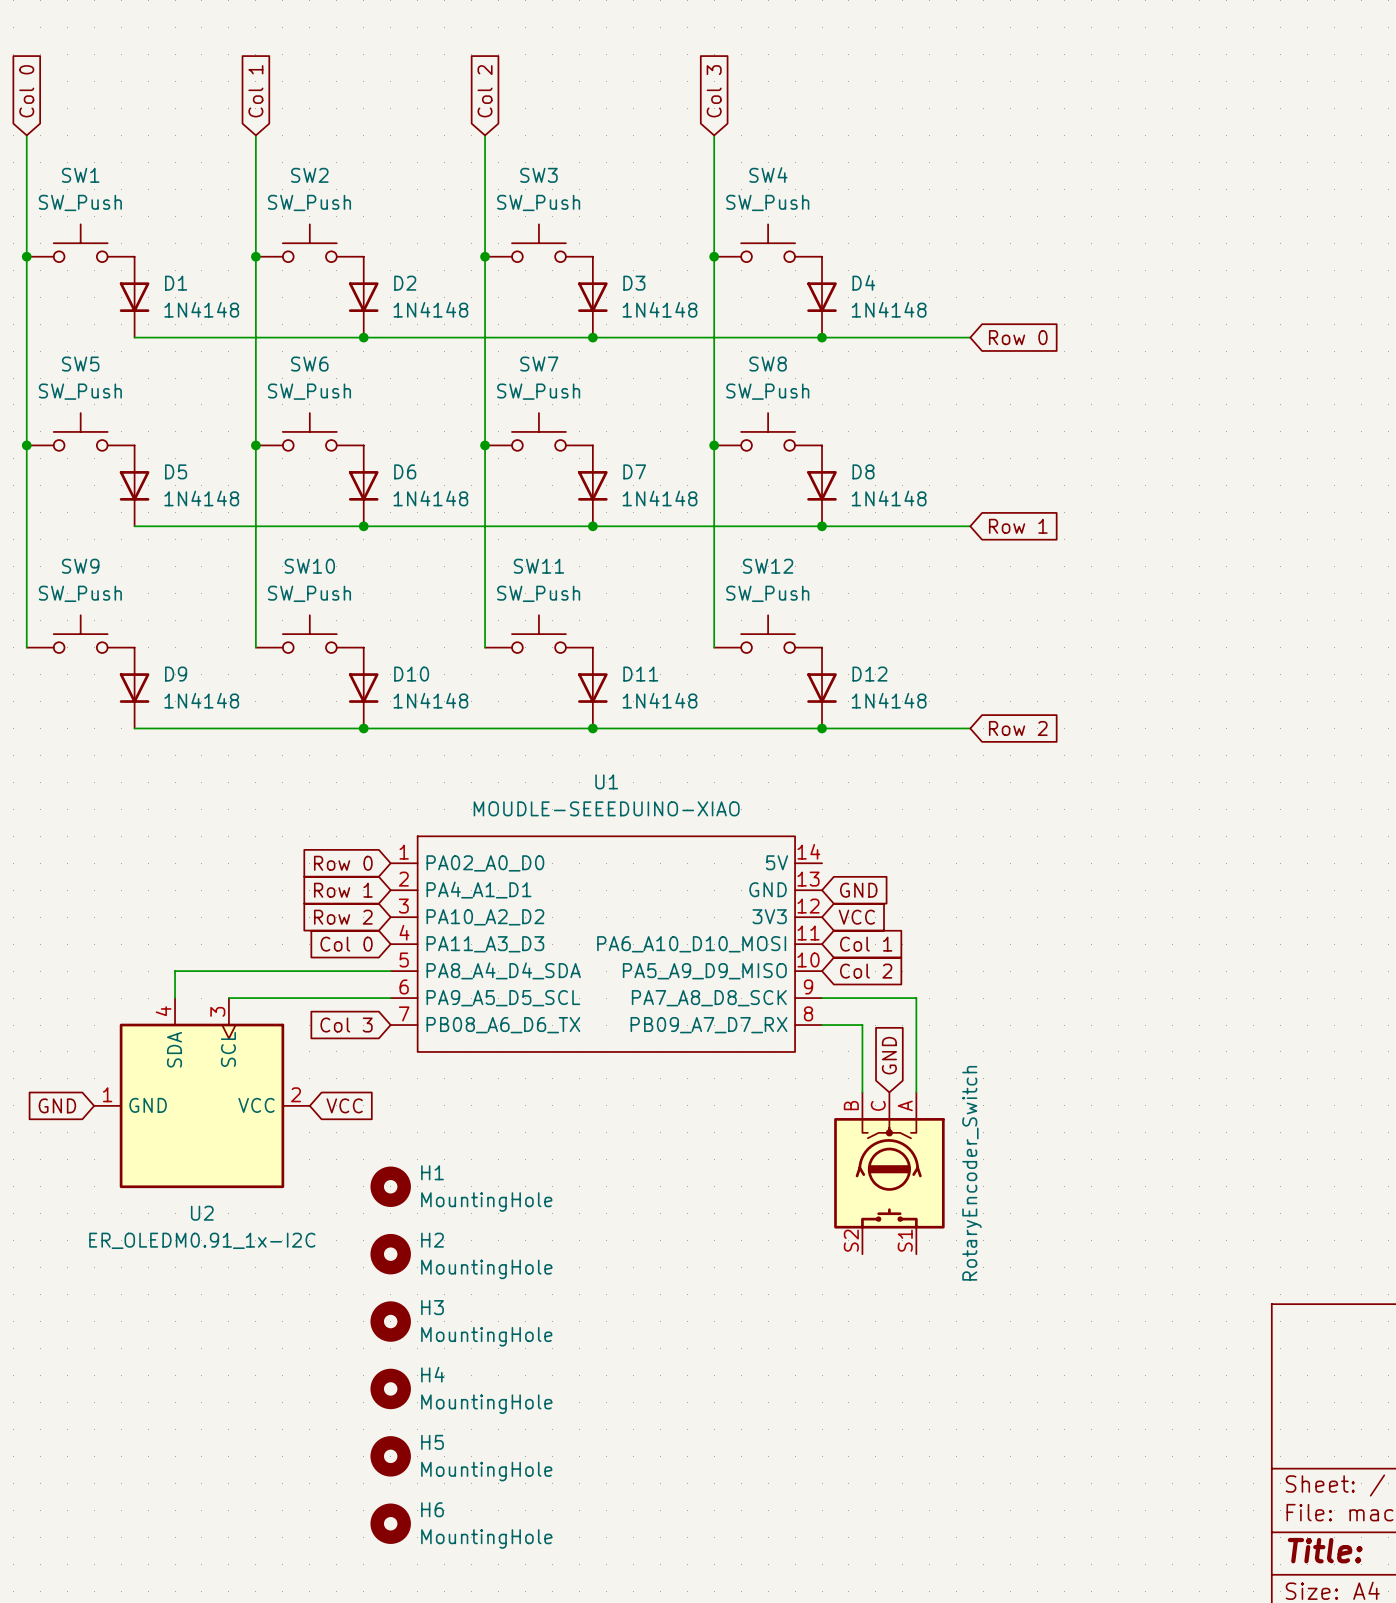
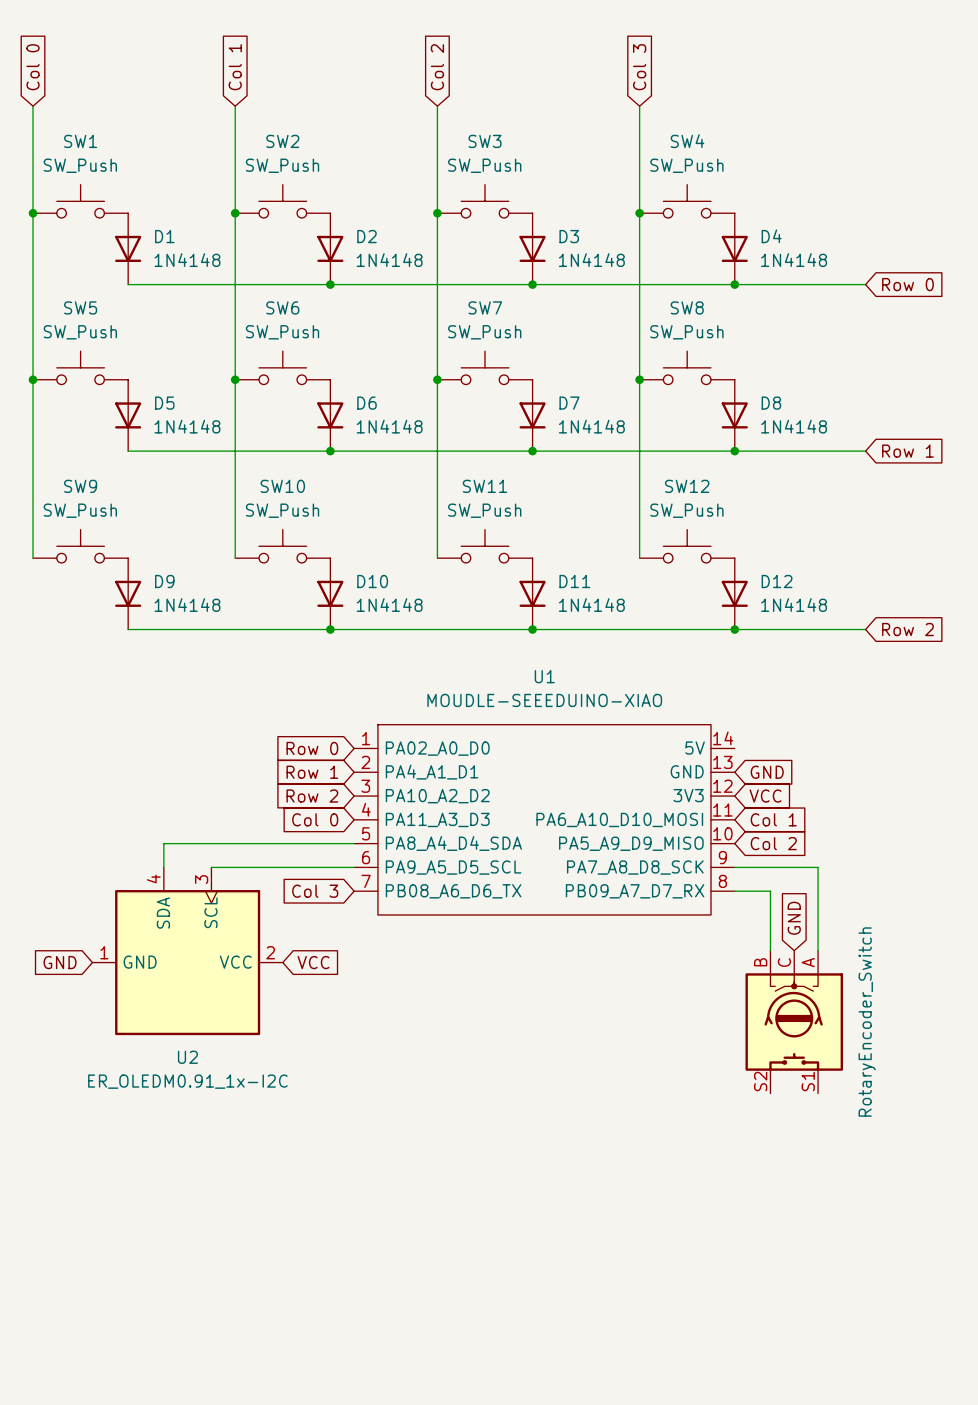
H1: MountingHole (390, 1186) -> none
H2: MountingHole (390, 1254) -> none
H3: MountingHole (390, 1321) -> none
H4: MountingHole (390, 1388) -> none
H5: MountingHole (390, 1456) -> none
H6: MountingHole (390, 1523) -> none

